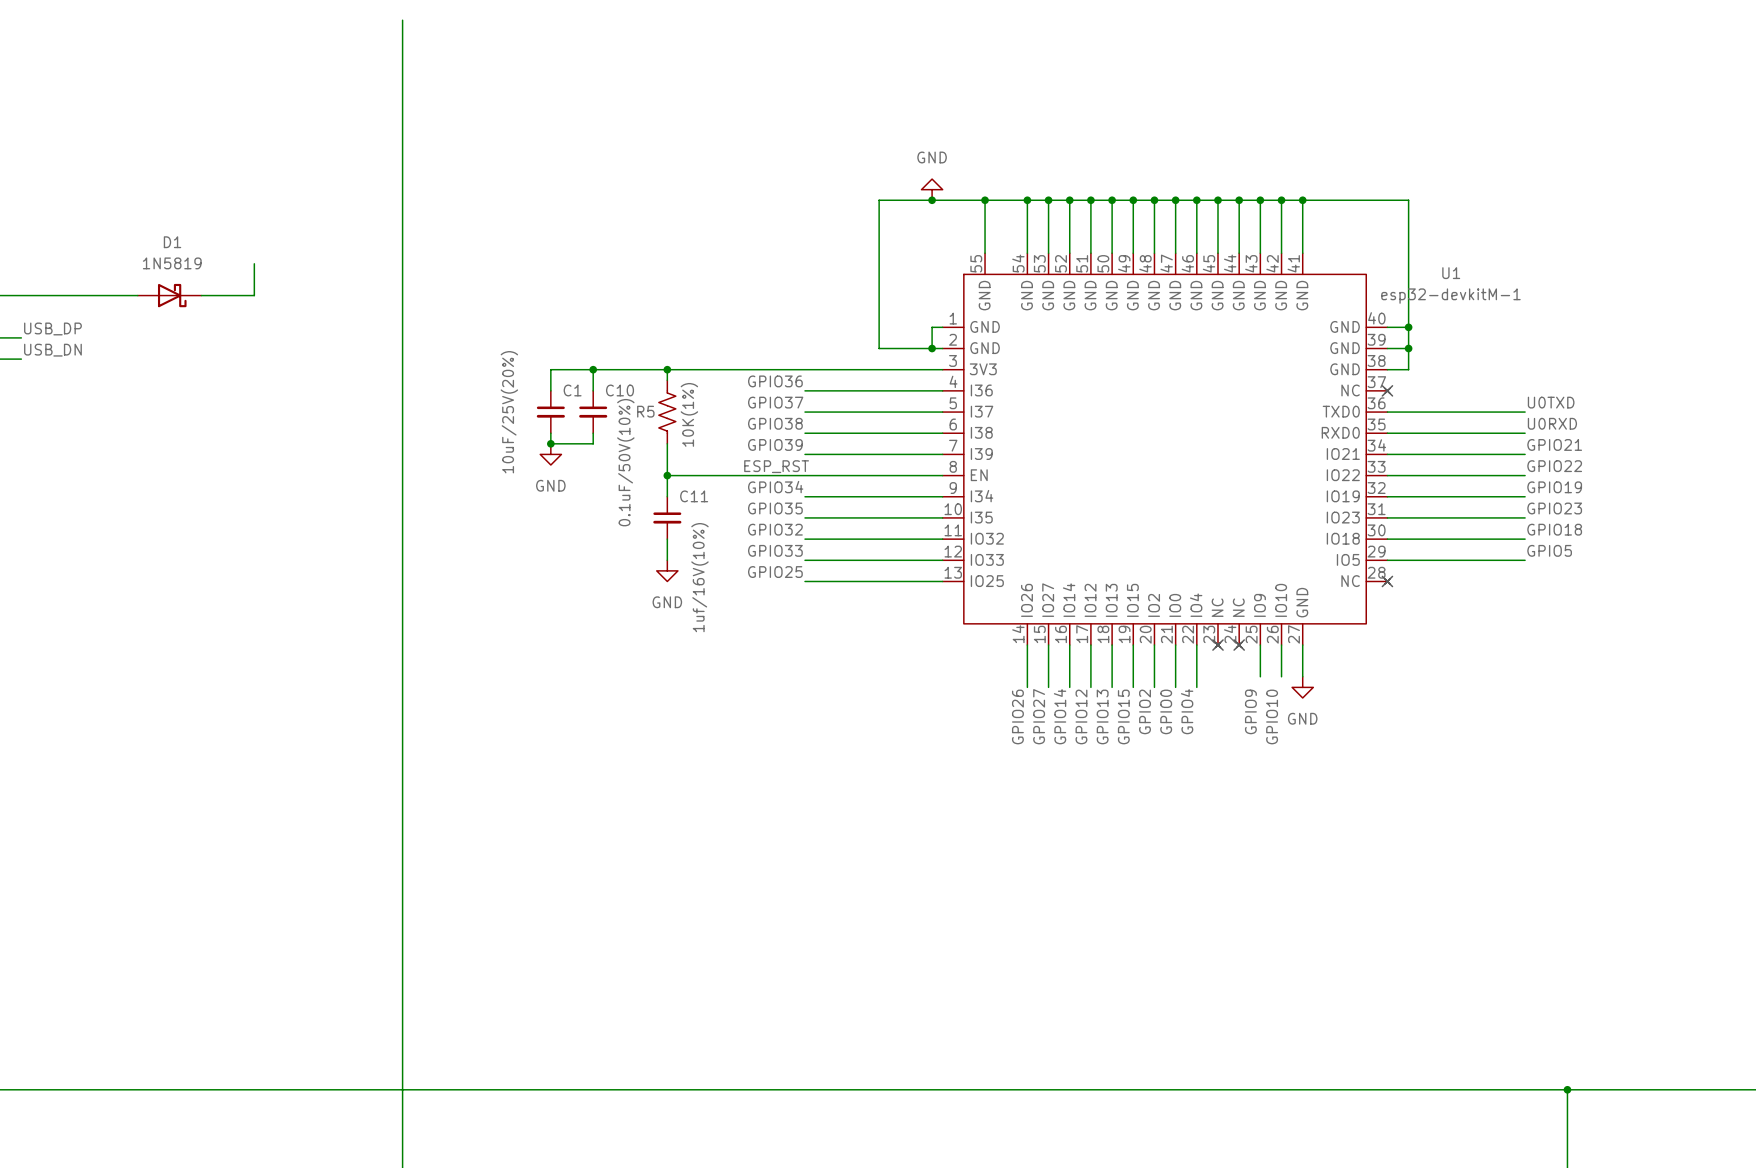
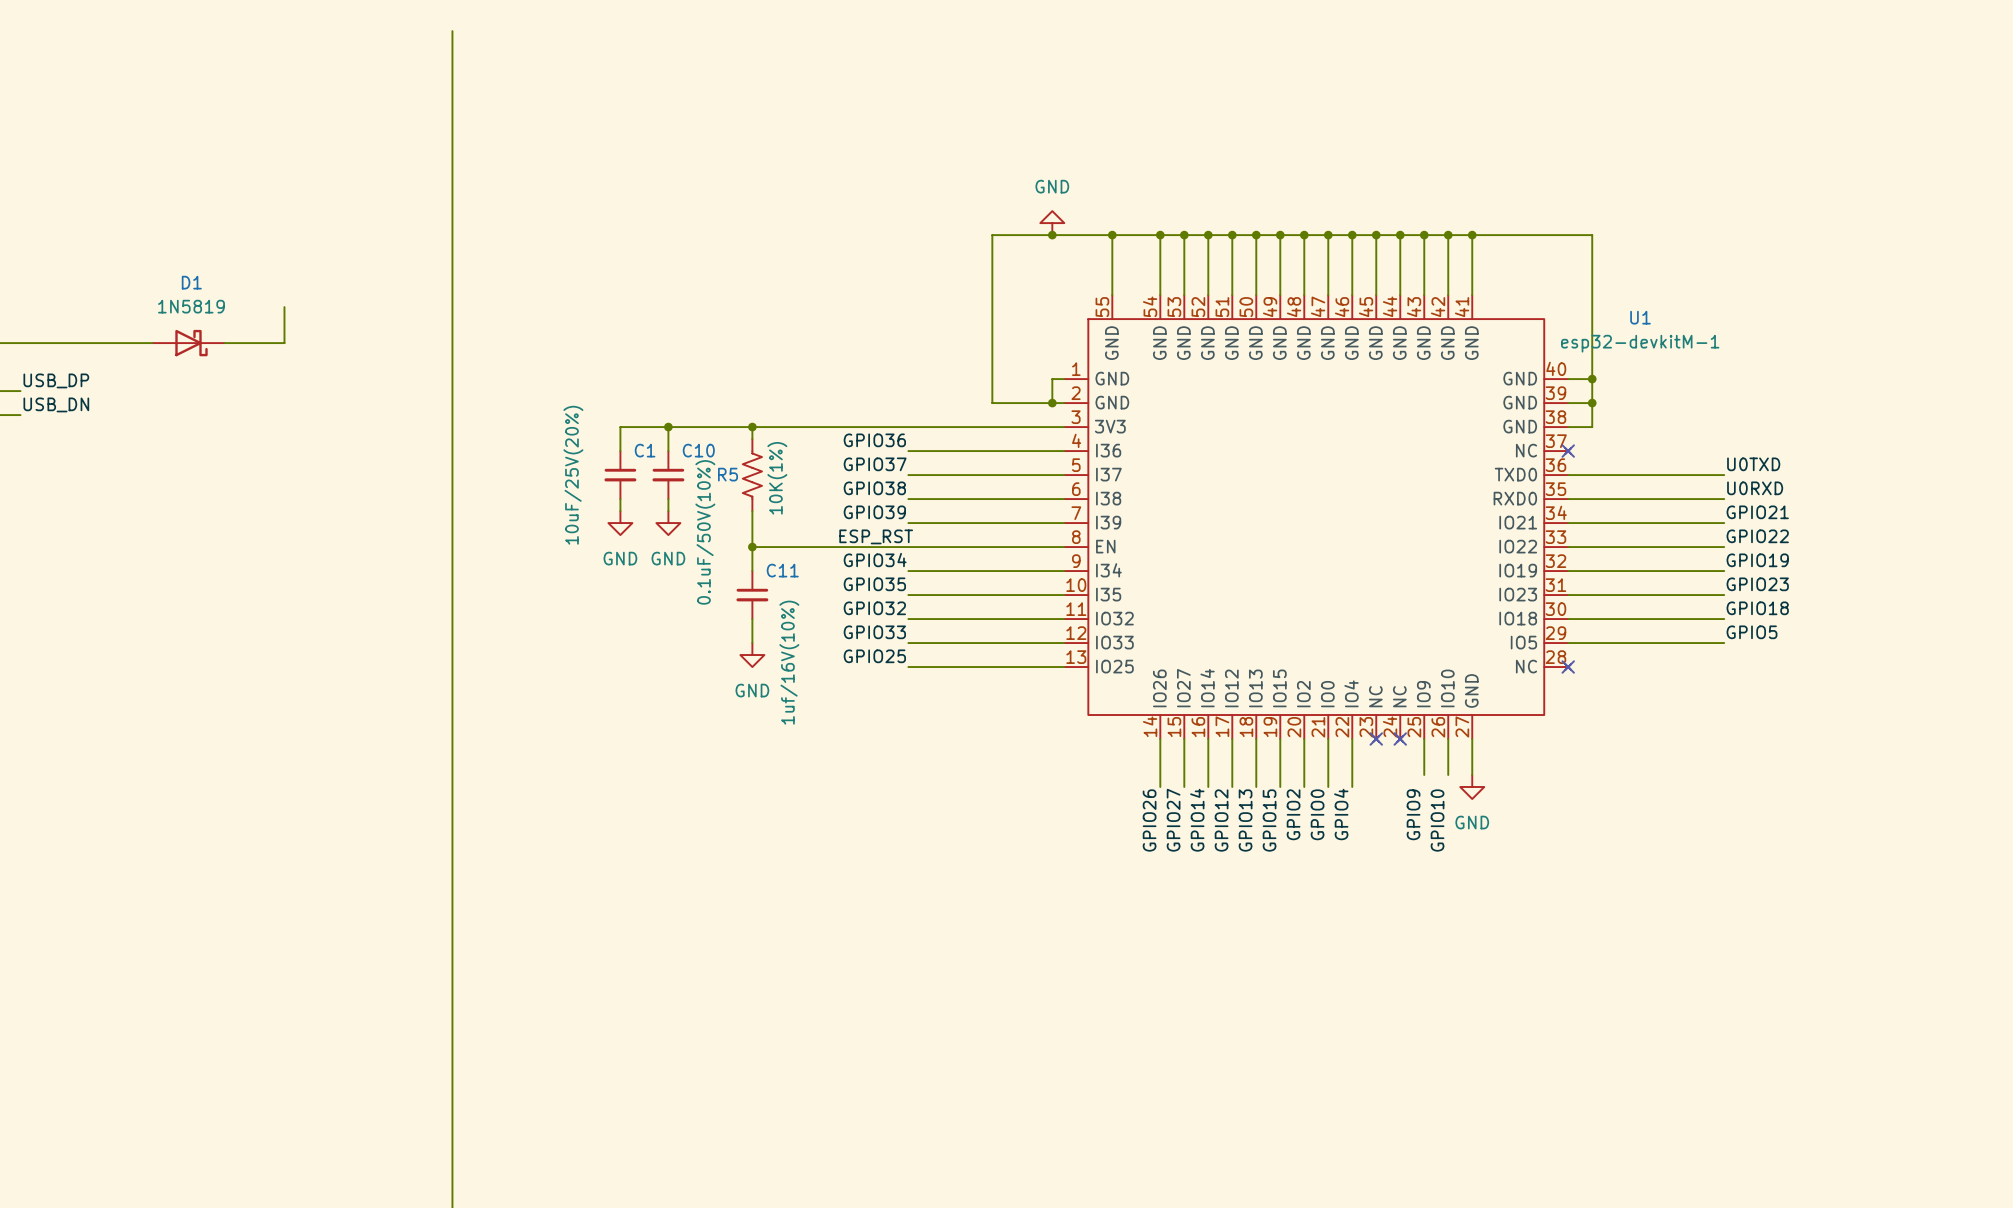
wire: (550, 443) (593, 443) -> none
junction: (550, 443) -> none
power symbol: none -> GND (668, 523)

